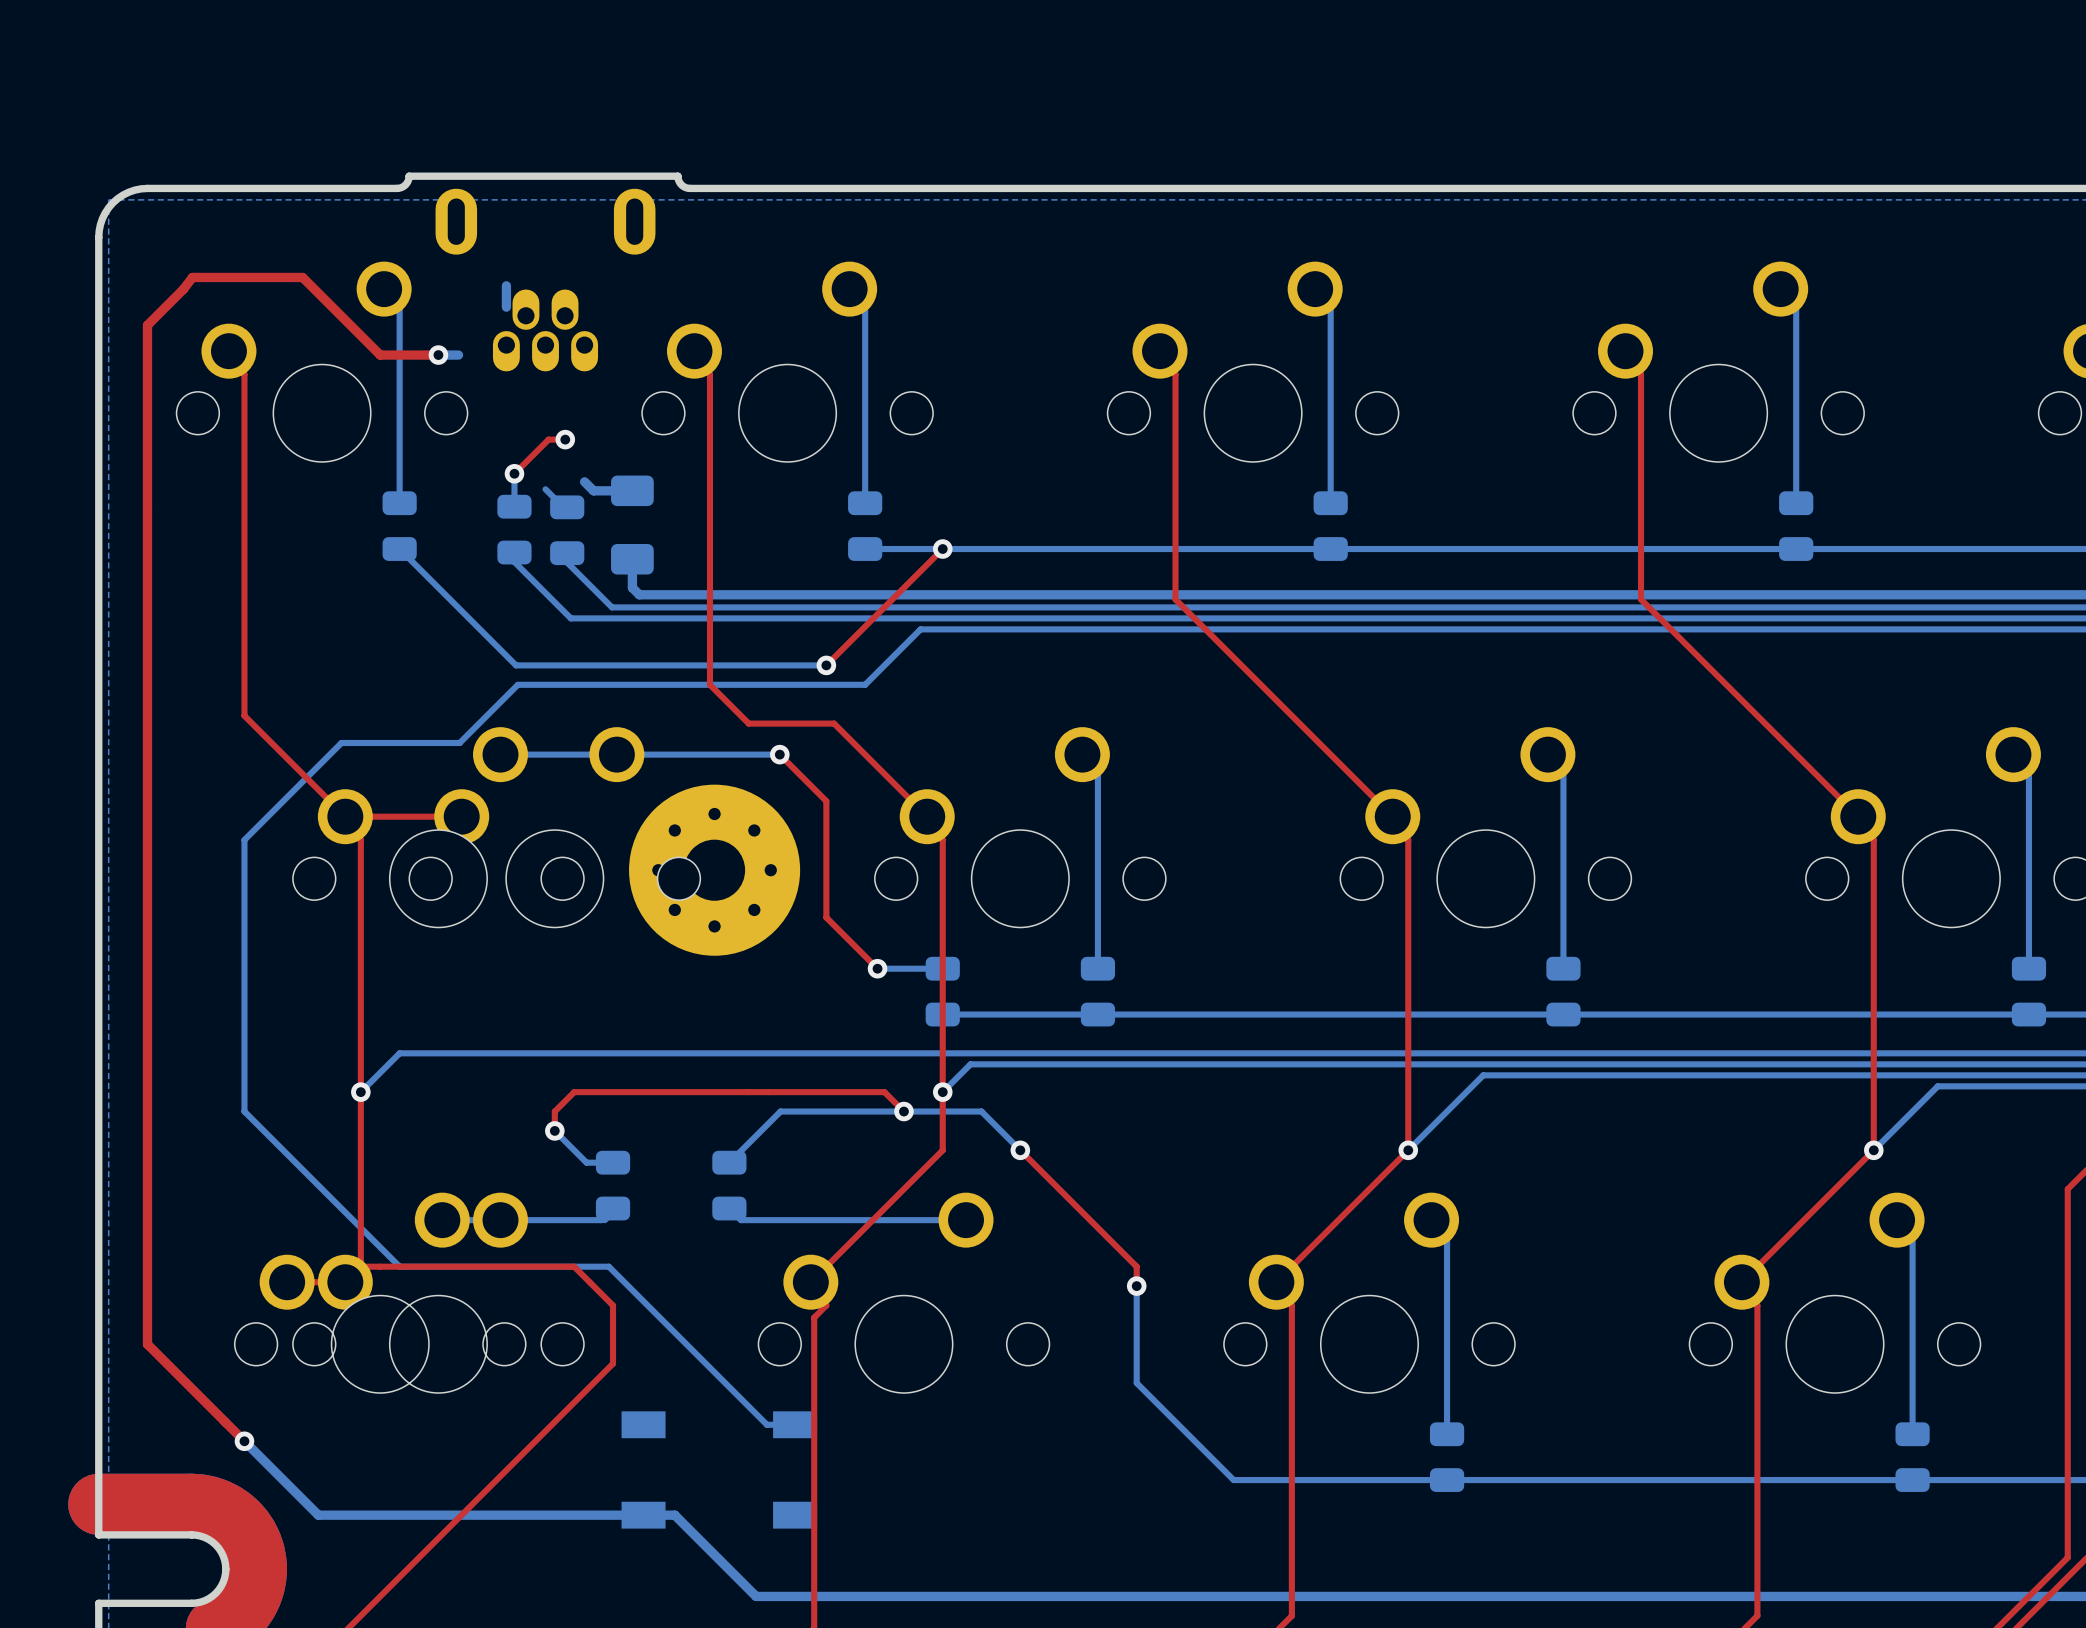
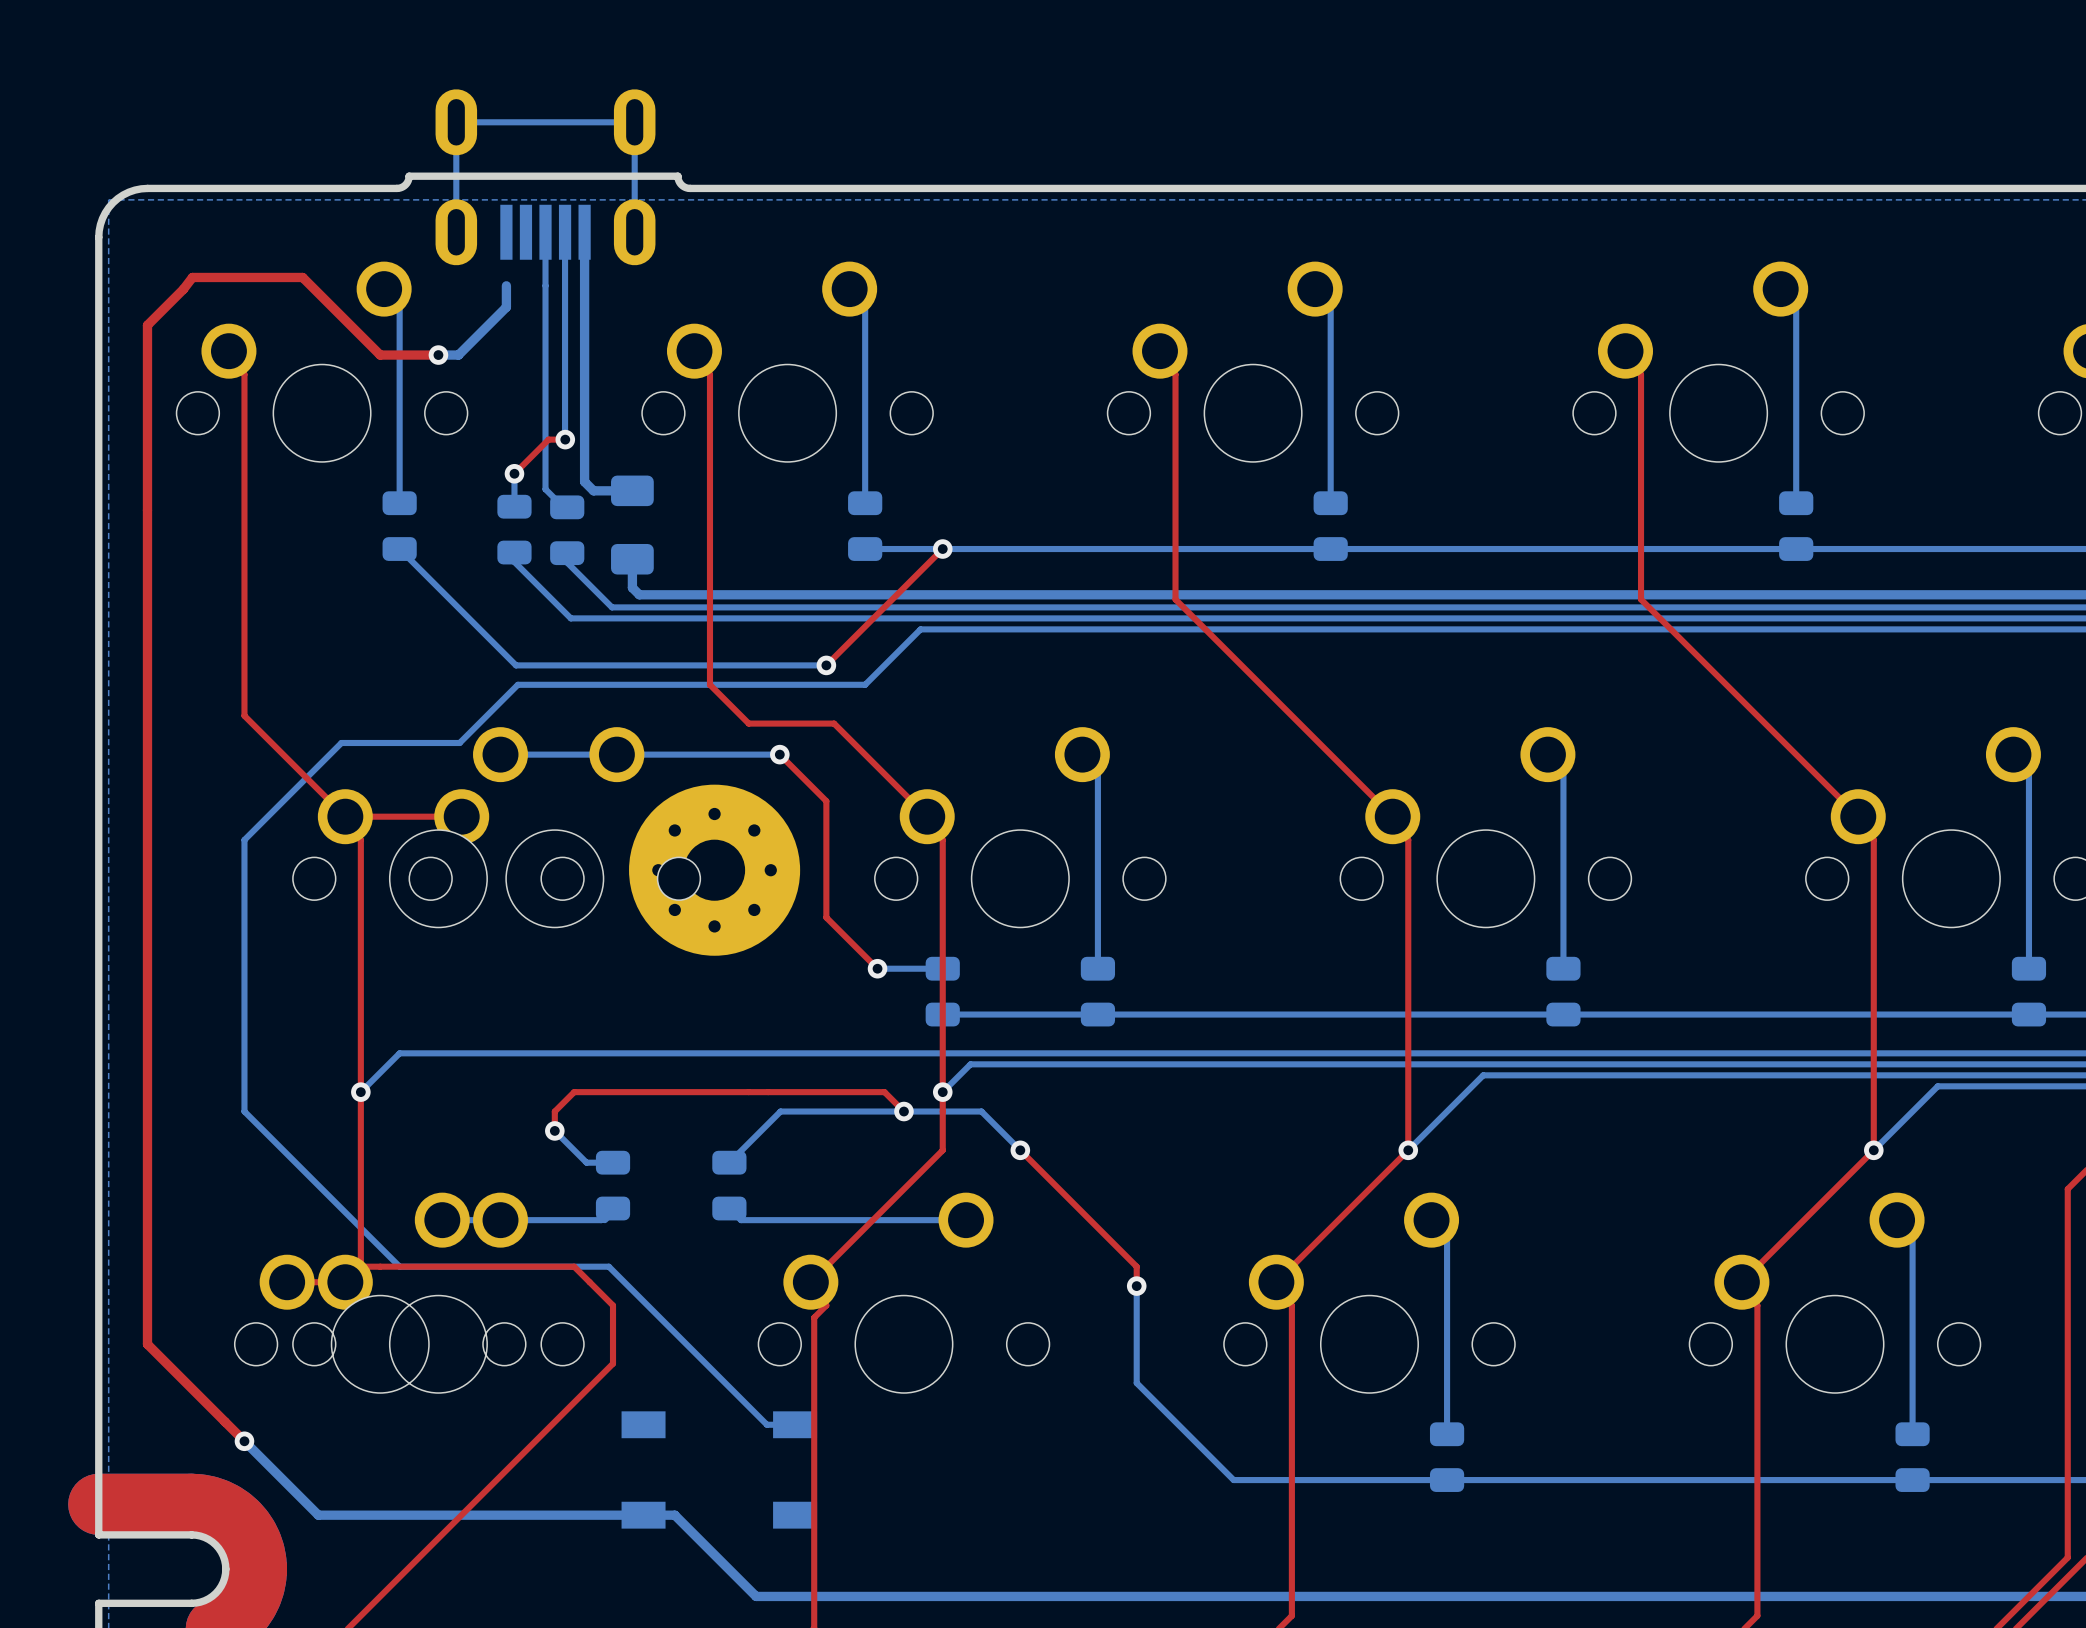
part: none -> (545, 177)
bottom track: none -> (456, 232) (456, 122) (634, 122) (634, 232)
bottom track: none -> (545, 232) (545, 489)
bottom track: none -> (565, 232) (565, 439)
bottom track: none -> (584, 232) (584, 481)
part: (545, 280) -> none
bottom track: none -> (506, 307) (458, 355)

